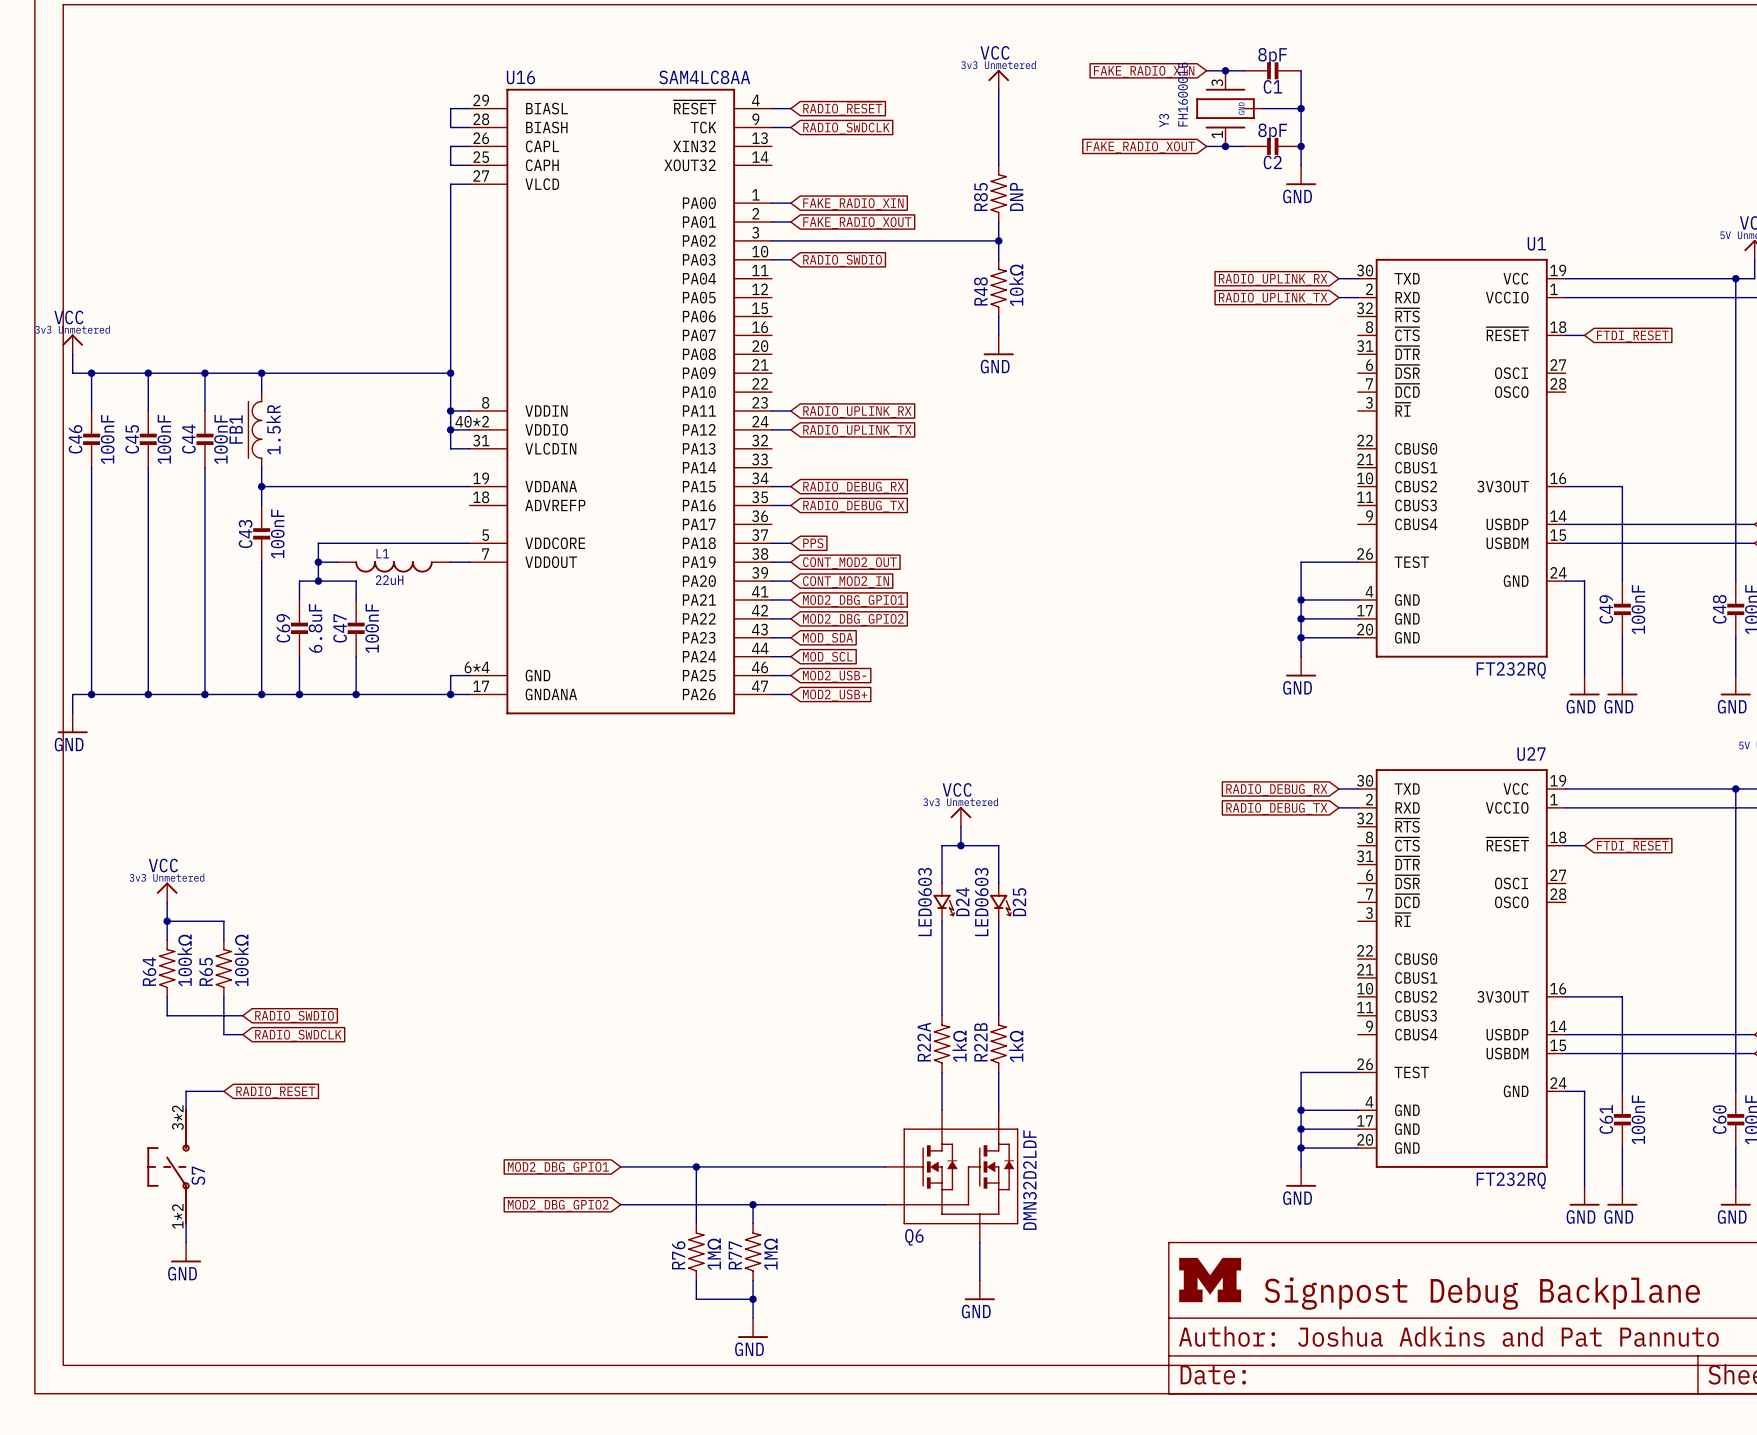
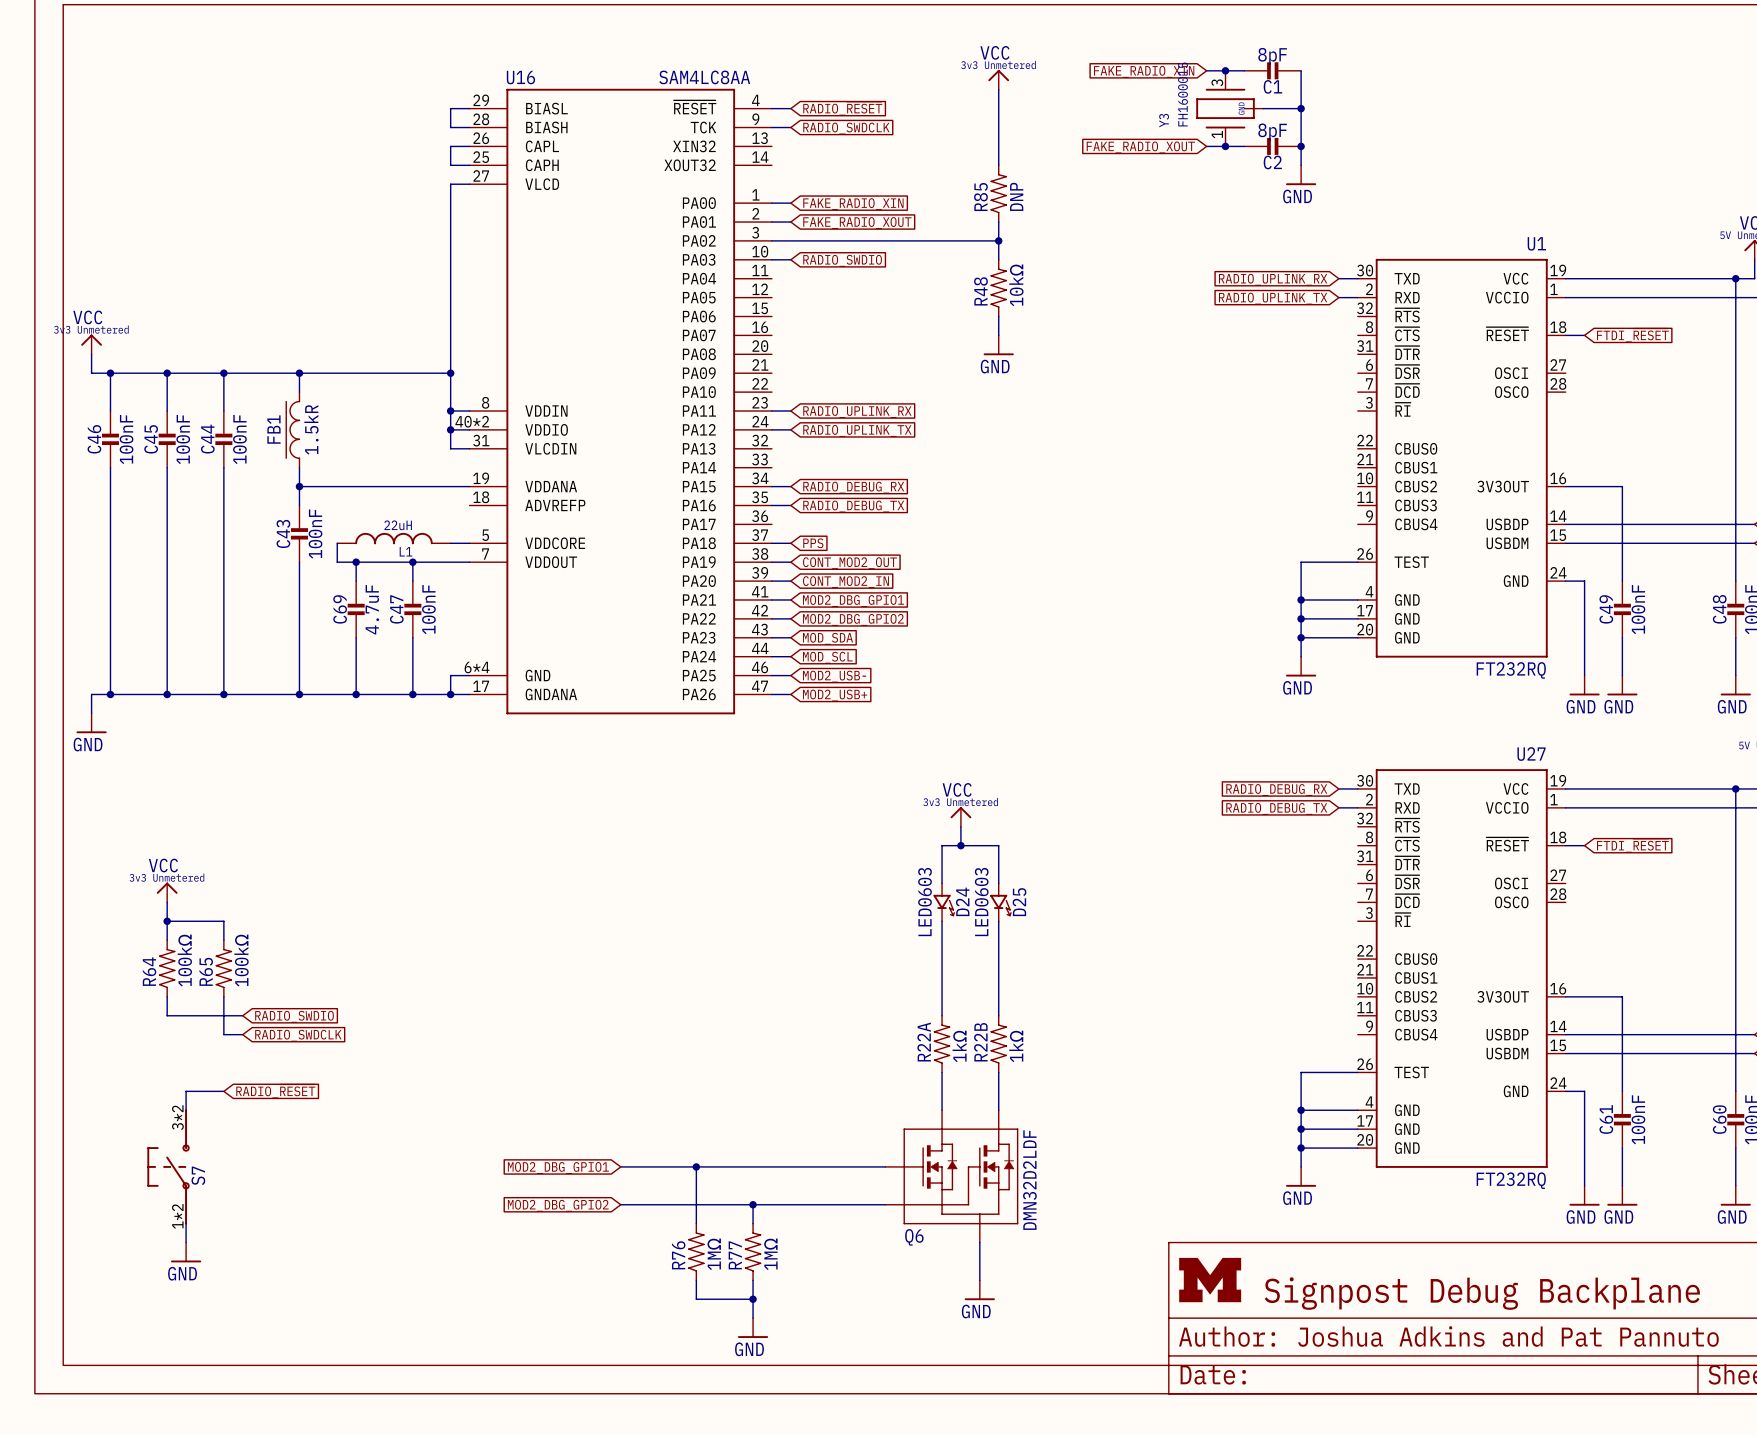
power symbol position: (72, 344) -> (91, 344)
wire: (72, 354) (72, 373) (91, 373) (91, 411) -> none
wire: none -> (91, 354) (91, 373)
junction: (91, 373) -> none
wire: none -> (110, 373) (110, 411)
junction: none -> (110, 373)
wire: (148, 373) (148, 411) -> (167, 373) (167, 411)
junction: (148, 373) -> none
junction: none -> (167, 373)
wire: (204, 373) (204, 411) -> (223, 373) (223, 411)
junction: (204, 373) -> none
junction: none -> (223, 373)
wire: (261, 373) (261, 392) -> (299, 373) (299, 392)
junction: (261, 373) -> none
junction: none -> (299, 373)
FB1 position: (255, 429) -> (292, 429)
C46 position: (91, 439) -> (110, 439)
C45 position: (148, 439) -> (167, 439)
C44 position: (204, 439) -> (223, 439)
wire: (91, 467) (91, 694) (72, 694) (72, 713) -> none
wire: none -> (110, 467) (110, 694)
wire: (148, 467) (148, 694) -> (167, 467) (167, 694)
wire: (204, 467) (204, 694) -> (223, 467) (223, 694)
wire: (261, 467) (261, 505) -> (299, 467) (299, 505)
wire: (261, 486) (299, 486) -> none
junction position: (261, 486) -> (299, 486)
C43 position: (261, 533) -> (299, 533)
wire: none -> (337, 543) (337, 562) (450, 562)
wire: (450, 543) (318, 543) (318, 581) -> none
wire: (261, 562) (261, 694) -> none
wire: (318, 562) (337, 562) -> none
junction: (318, 562) -> none
wire: none -> (356, 562) (356, 581)
junction: none -> (356, 562)
wire: none -> (412, 562) (412, 581)
junction: none -> (412, 562)
L1 rotation: 0° (393, 566) -> 180° (393, 538)
wire: (299, 581) (356, 581) (356, 599) -> (299, 581) (299, 562)
junction: (318, 581) -> none
C69 position: (299, 628) -> (356, 609)
C69 value: 6.8uF (315, 628) -> 4.7uF (372, 609)
C47 position: (356, 628) -> (412, 609)
wire: none -> (412, 637) (412, 694)
wire: none -> (91, 694) (91, 713)
junction: (91, 694) -> none
junction: none -> (110, 694)
junction: (148, 694) -> none
junction: none -> (167, 694)
junction: (204, 694) -> none
junction: none -> (223, 694)
junction: (261, 694) -> none
junction: none -> (412, 694)
power symbol position: GND (72, 723) -> GND (91, 723)

